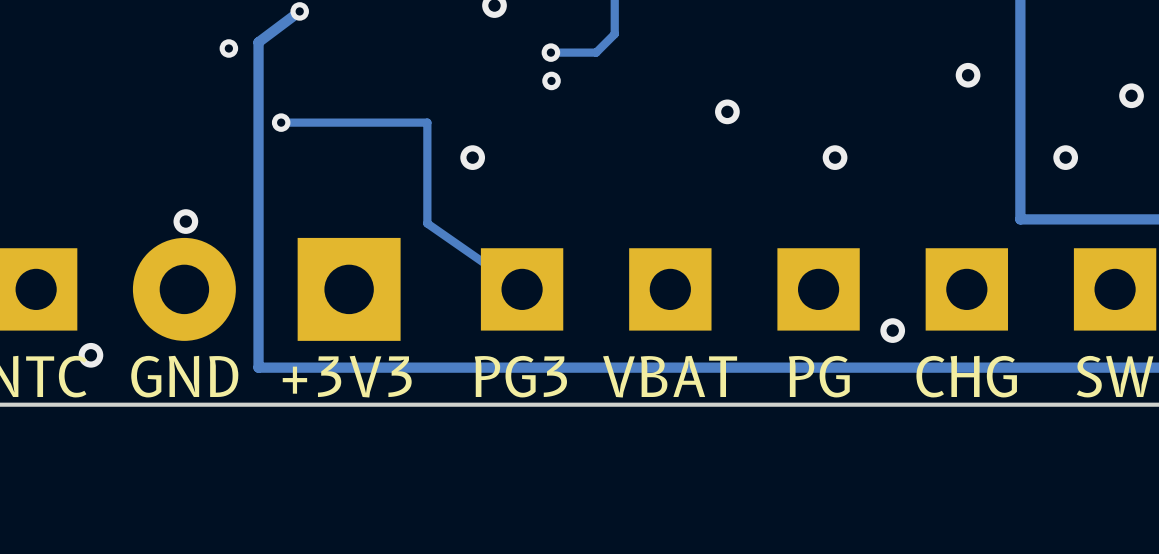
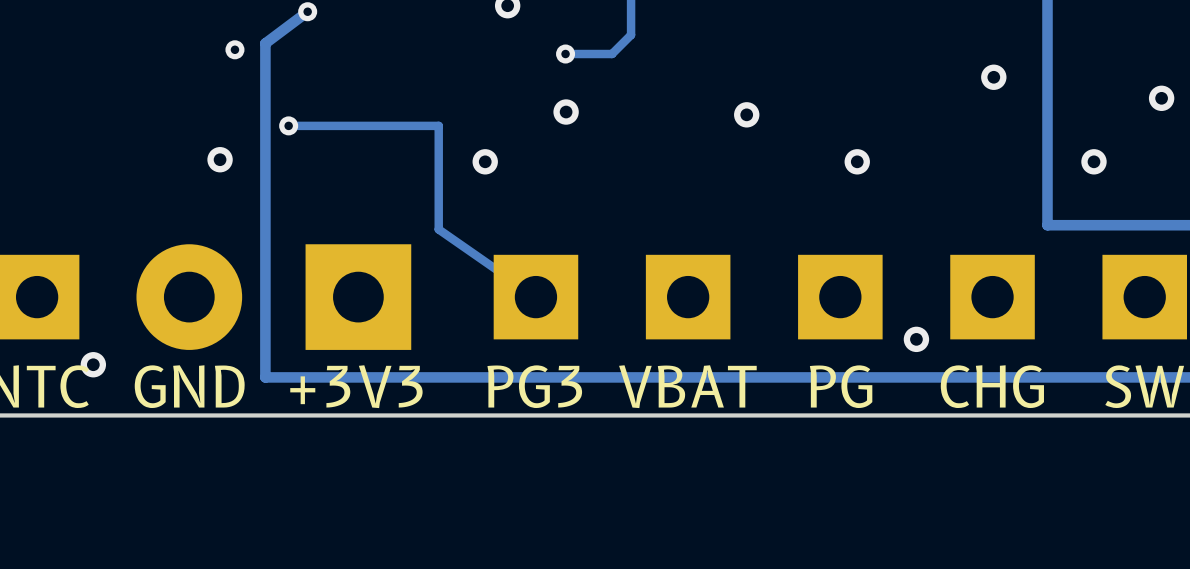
via: (551, 80) -> none
via: none -> (566, 112)
via position: (185, 221) -> (220, 159)

